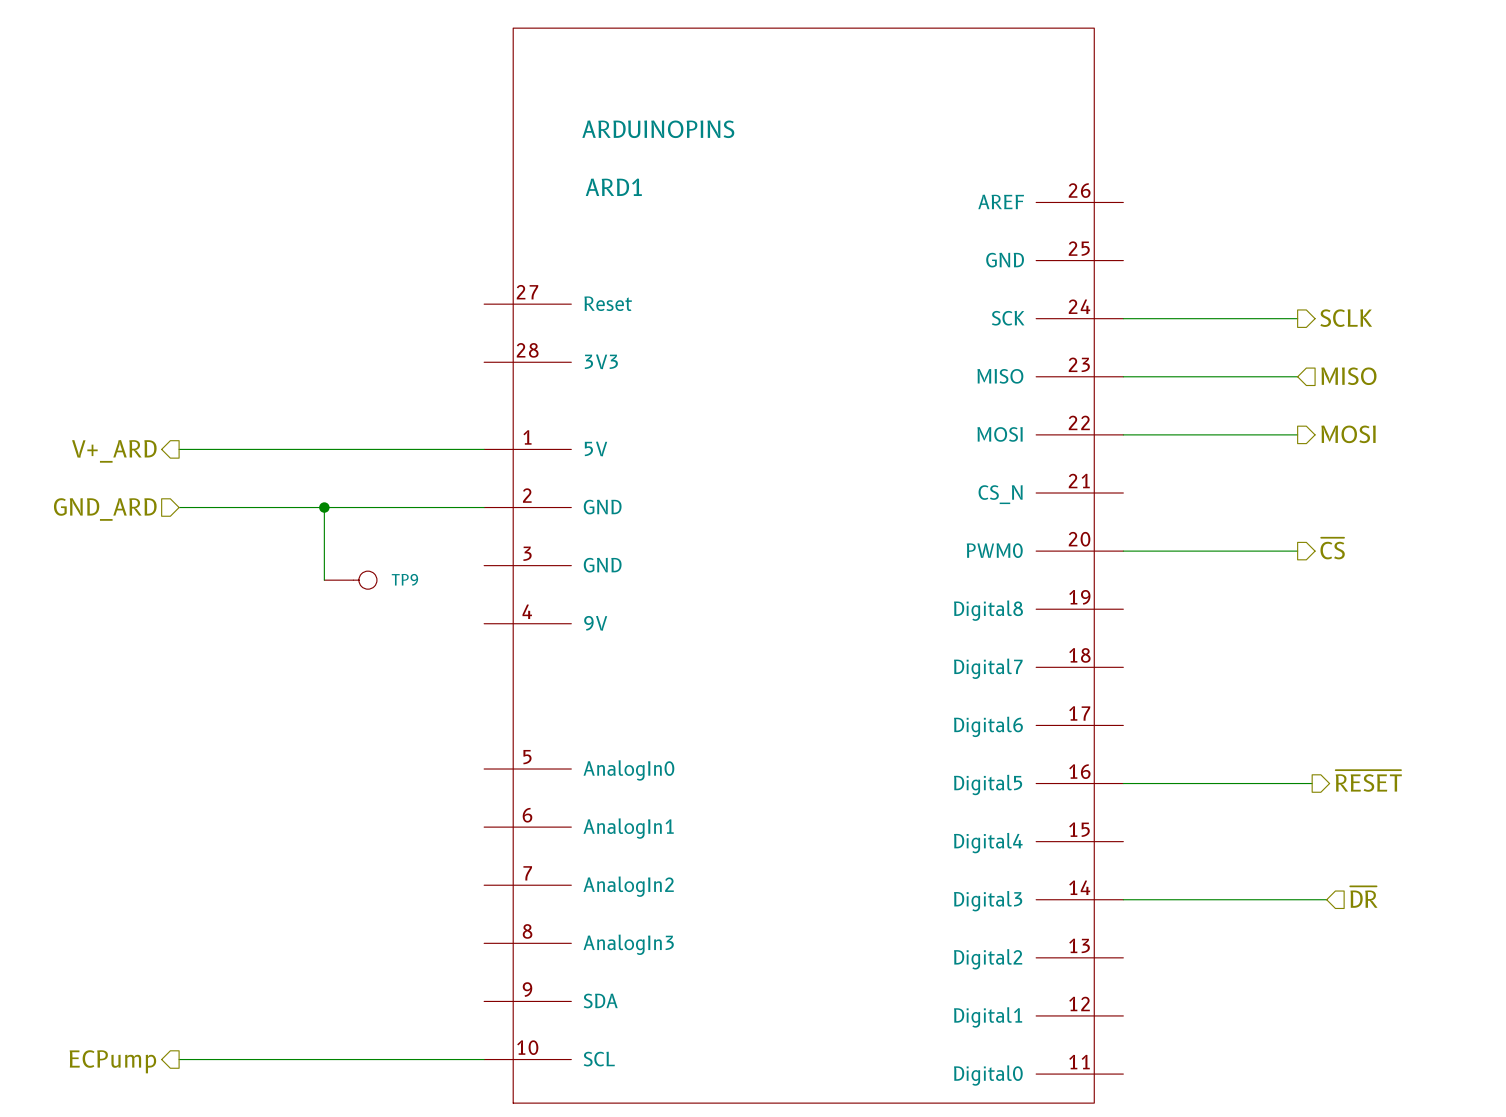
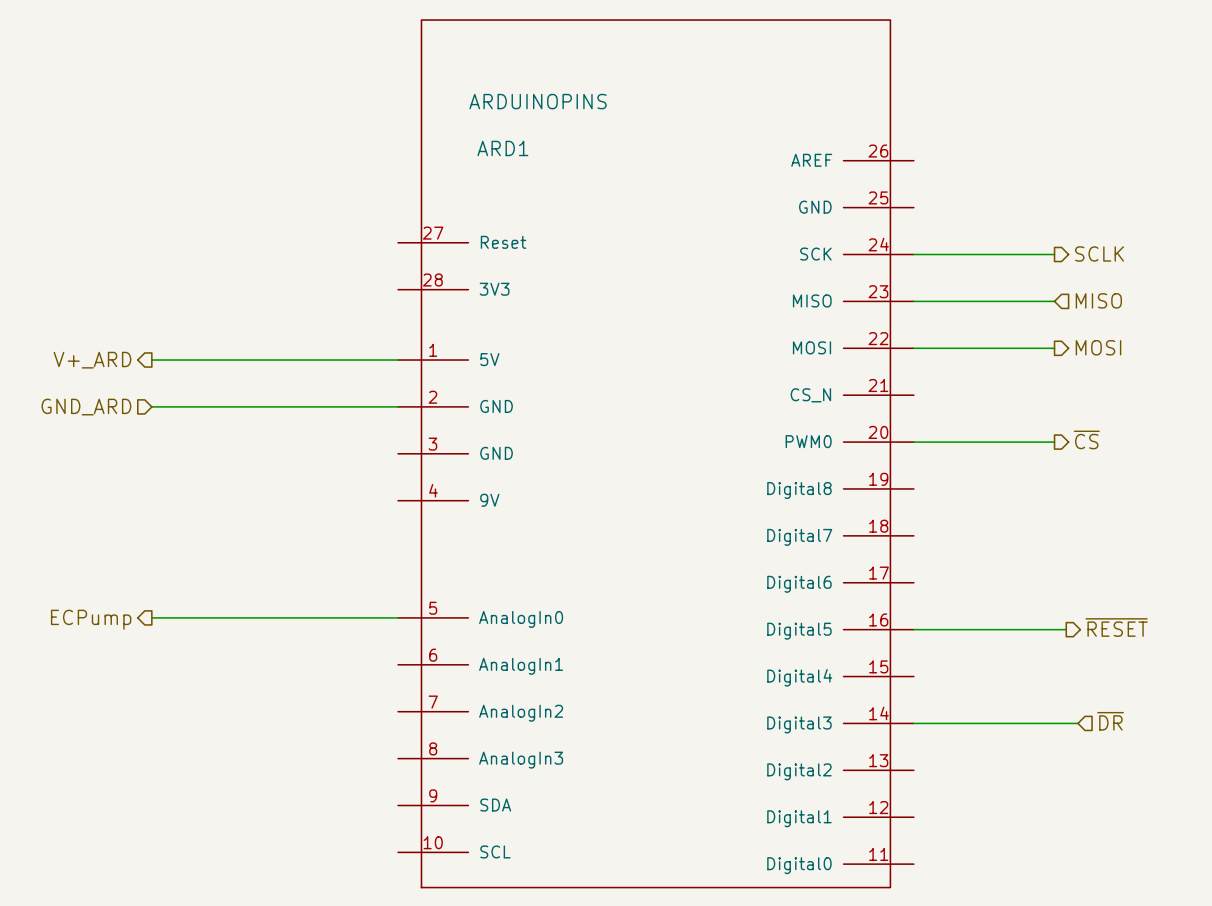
wire: (324, 507) (324, 580) -> none
junction: (324, 507) -> none
TP9: (350, 580) -> none
wire: none -> (151, 617) (398, 617)
hierarchical label: none -> ECPump (91, 619)
wire: (179, 1059) (484, 1059) -> none
hierarchical label: ECPump (112, 1061) -> none

